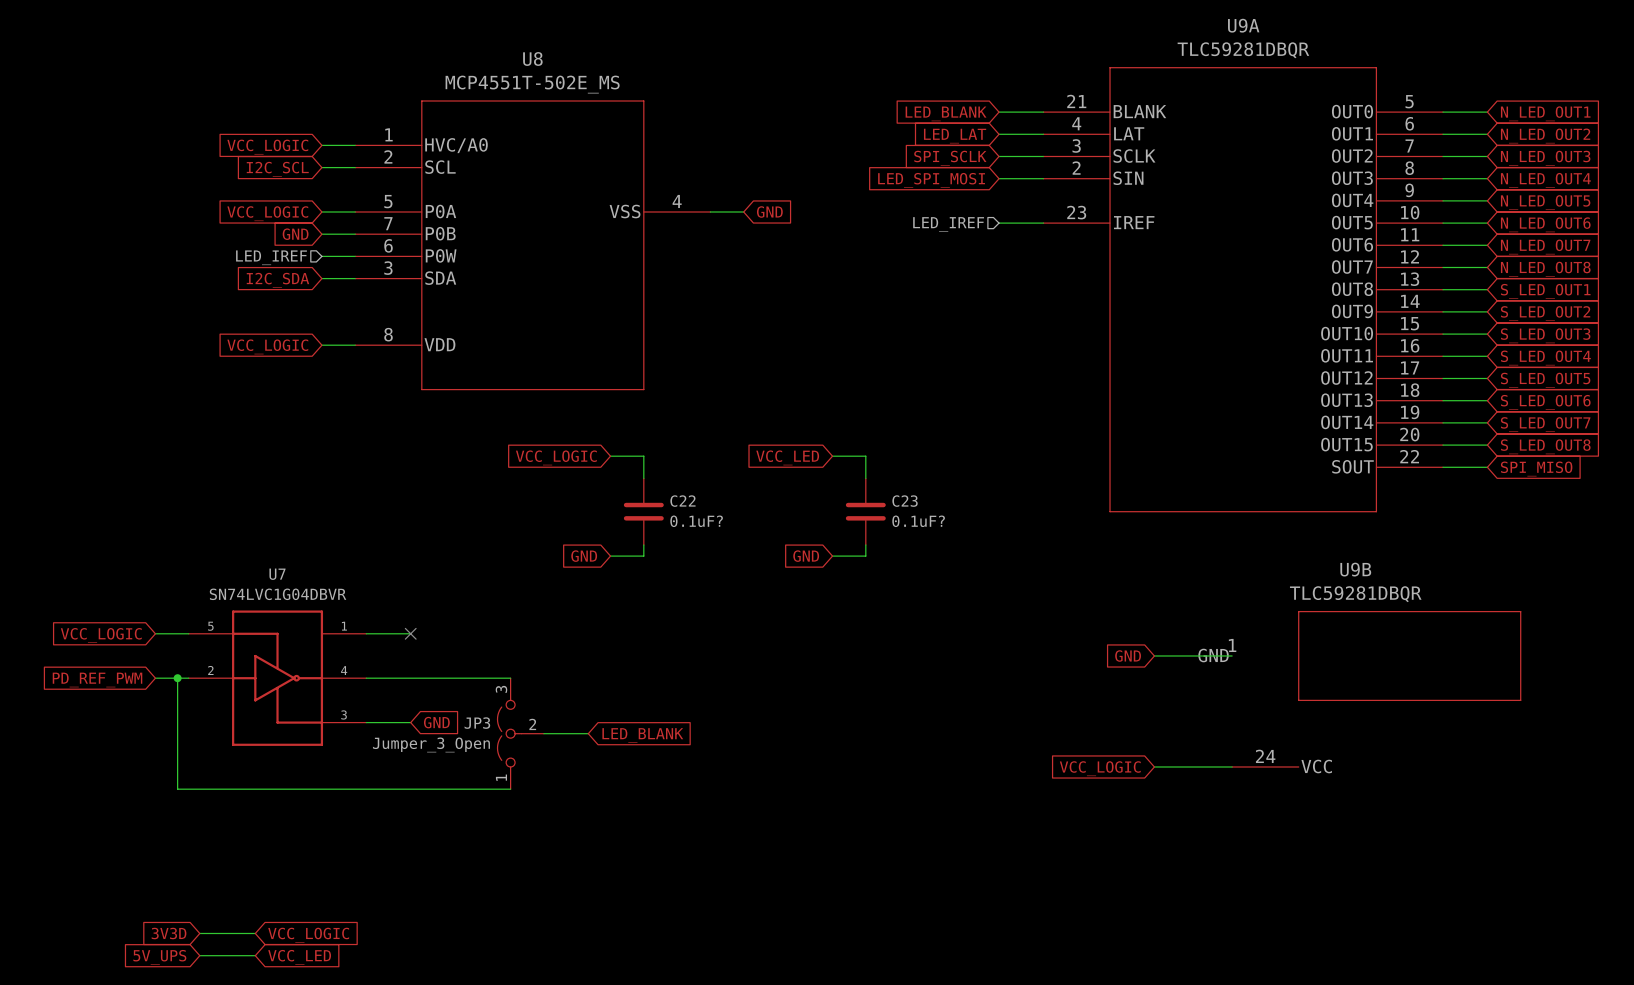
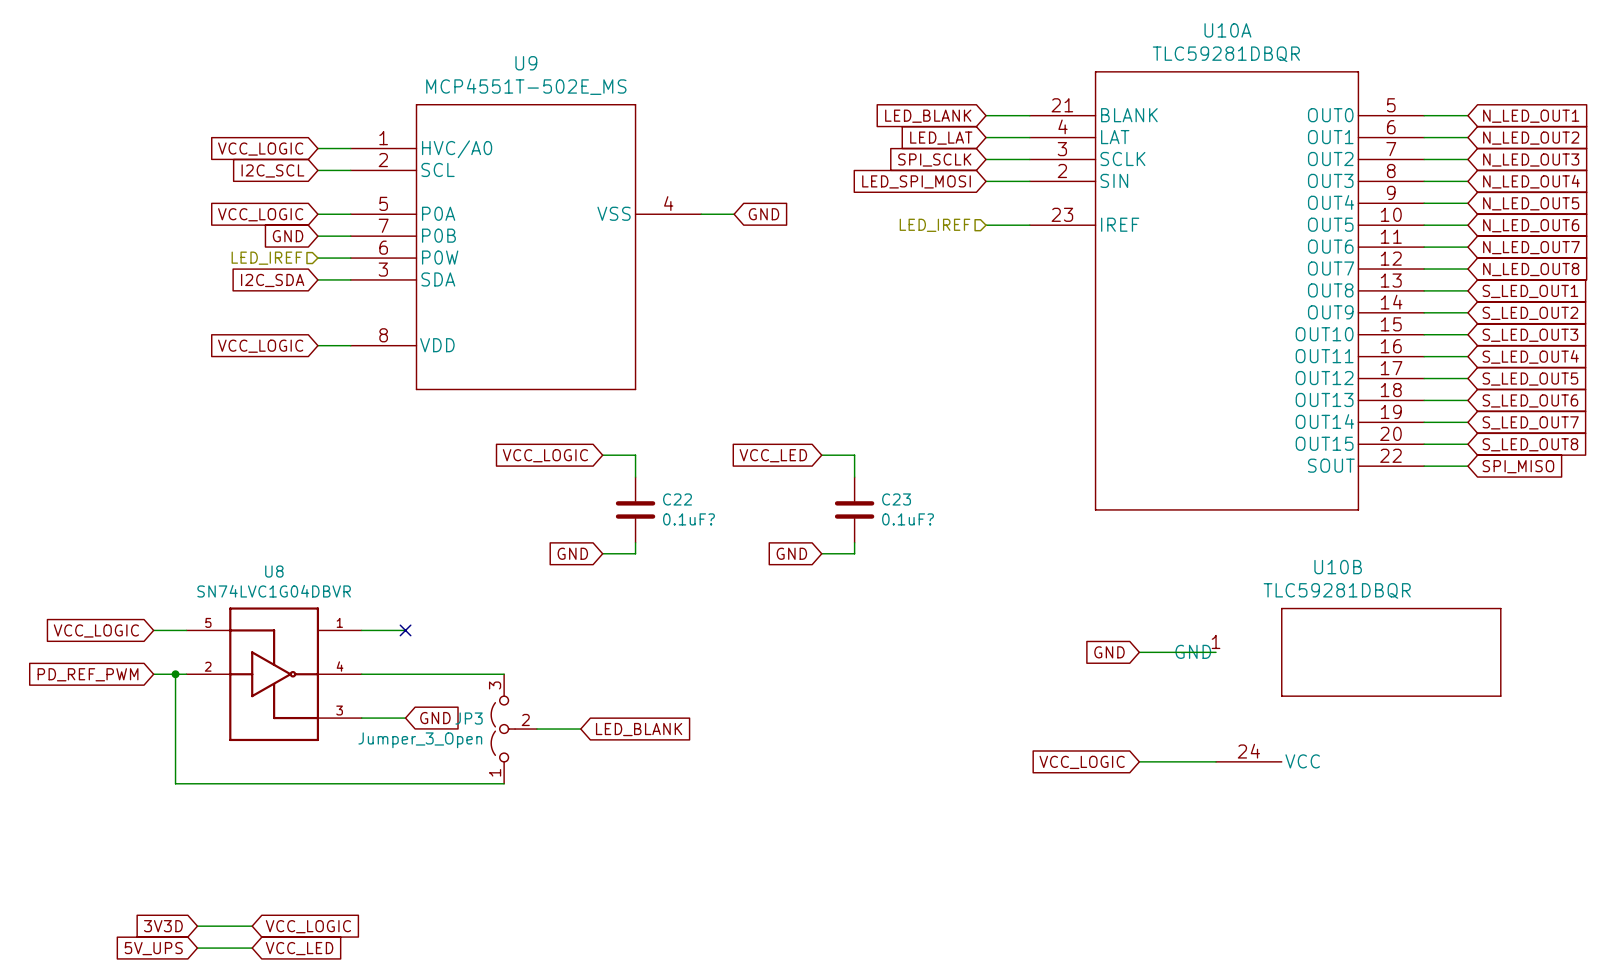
U9A name: U9A (1243, 25) -> U10A (1227, 30)
U8 name: U8 (532, 58) -> U9 (526, 63)
U9B name: U9B (1355, 569) -> U10B (1338, 567)
U7 name: U7 (277, 574) -> U8 (274, 571)

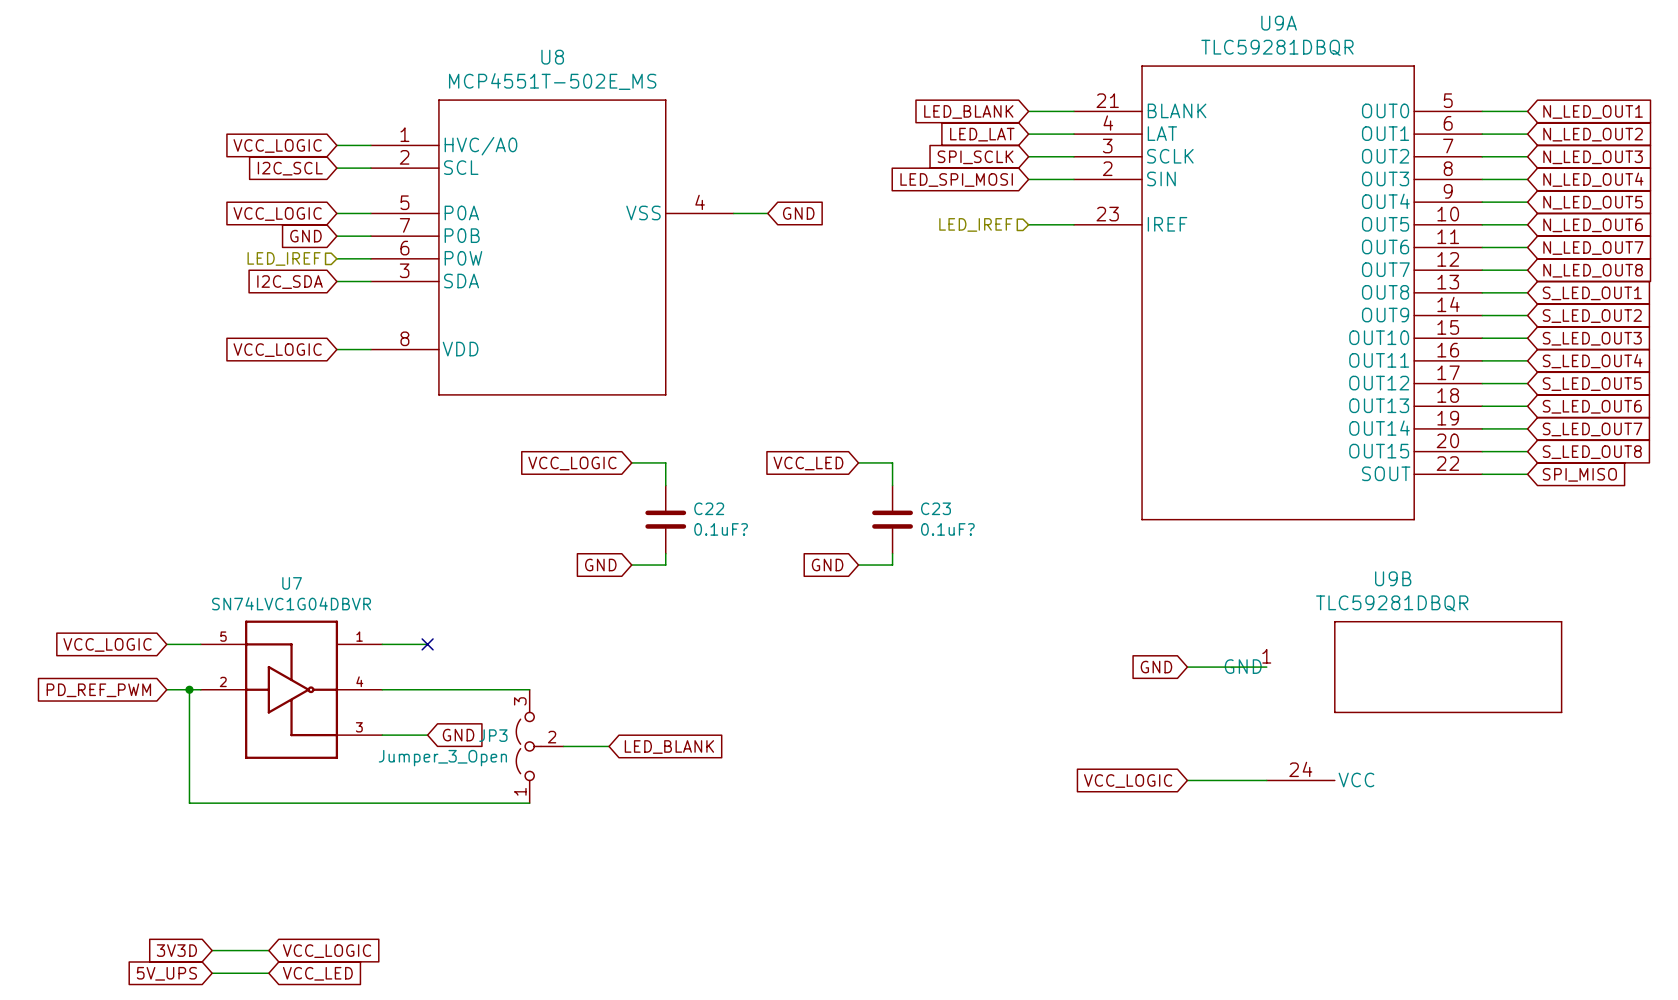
U10A name: U10A (1227, 30) -> U9A (1279, 23)
U9 name: U9 (526, 63) -> U8 (552, 57)
U10B name: U10B (1338, 567) -> U9B (1393, 578)
U8 name: U8 (274, 571) -> U7 (292, 583)

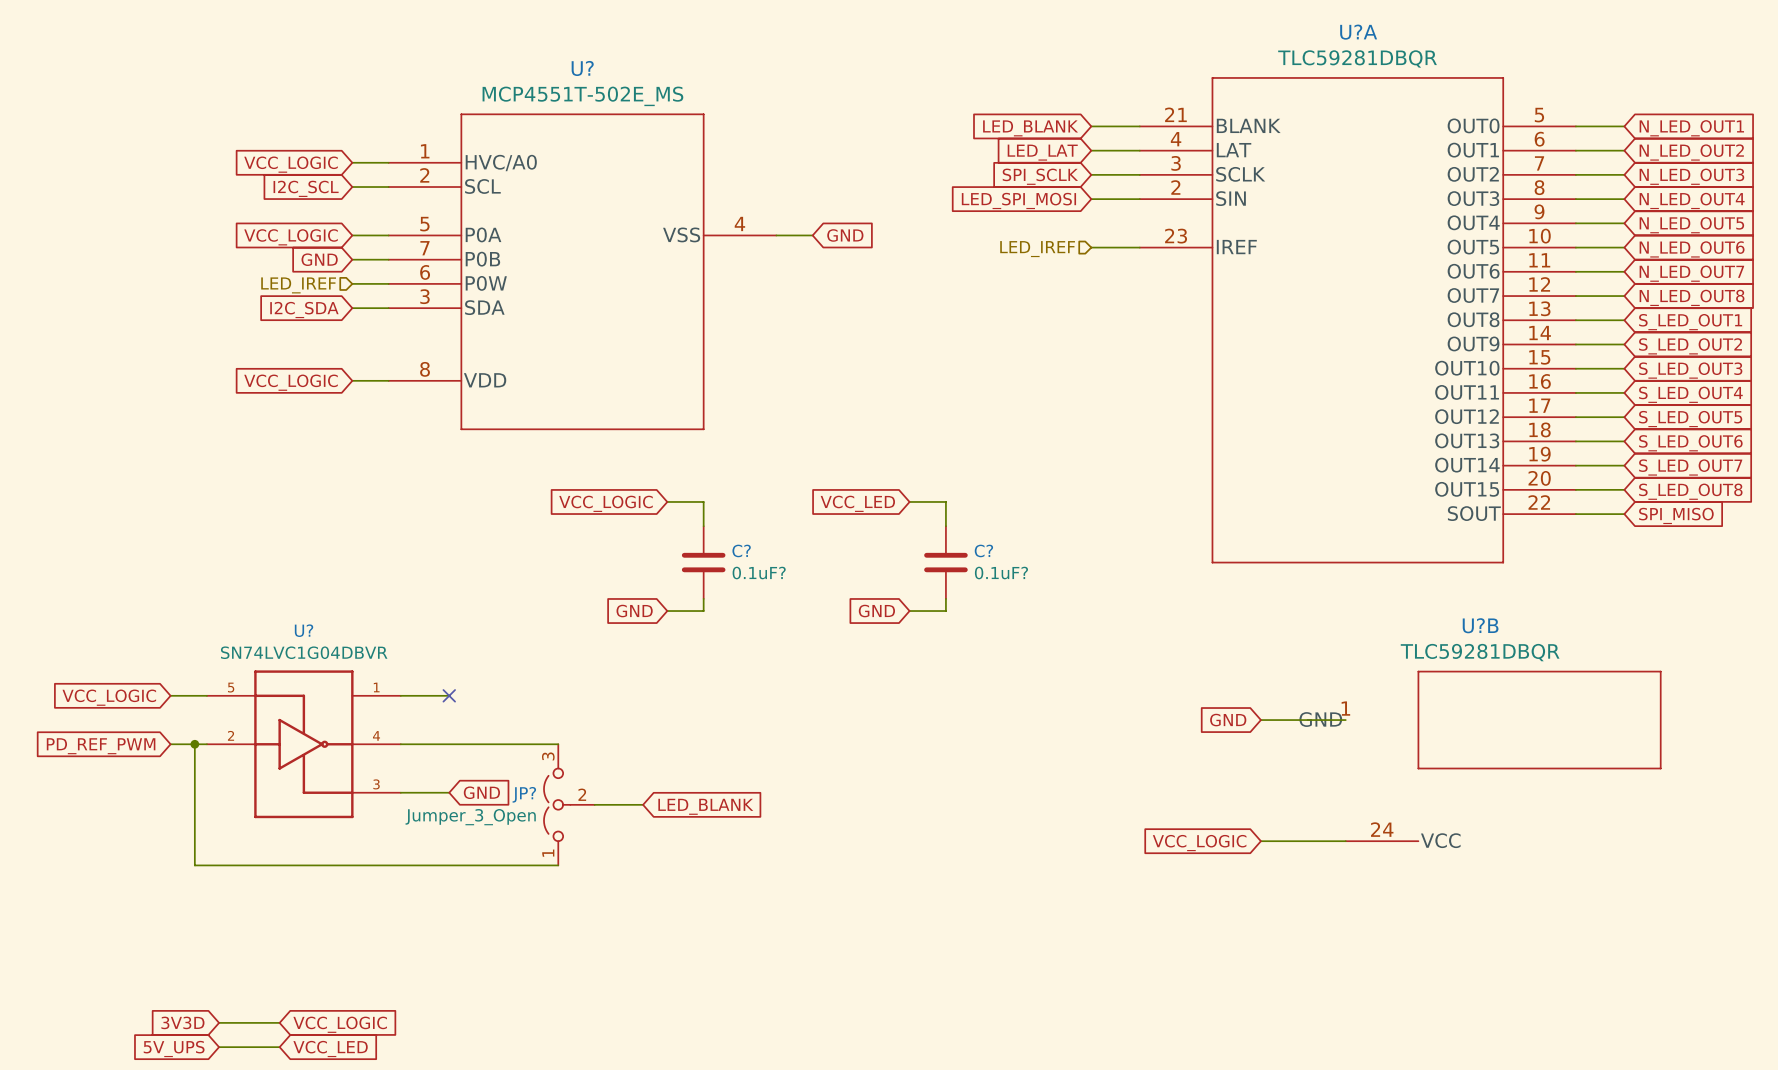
U9A name: U9A (1279, 23) -> U?A (1358, 32)
U8 name: U8 (552, 57) -> U? (582, 68)
C22 name: C22 (709, 508) -> C? (741, 550)
C23 name: C23 (935, 508) -> C? (983, 550)
U9B name: U9B (1393, 578) -> U?B (1480, 625)
U7 name: U7 (292, 583) -> U? (304, 630)
JP3 name: JP3 (493, 735) -> JP? (524, 794)

